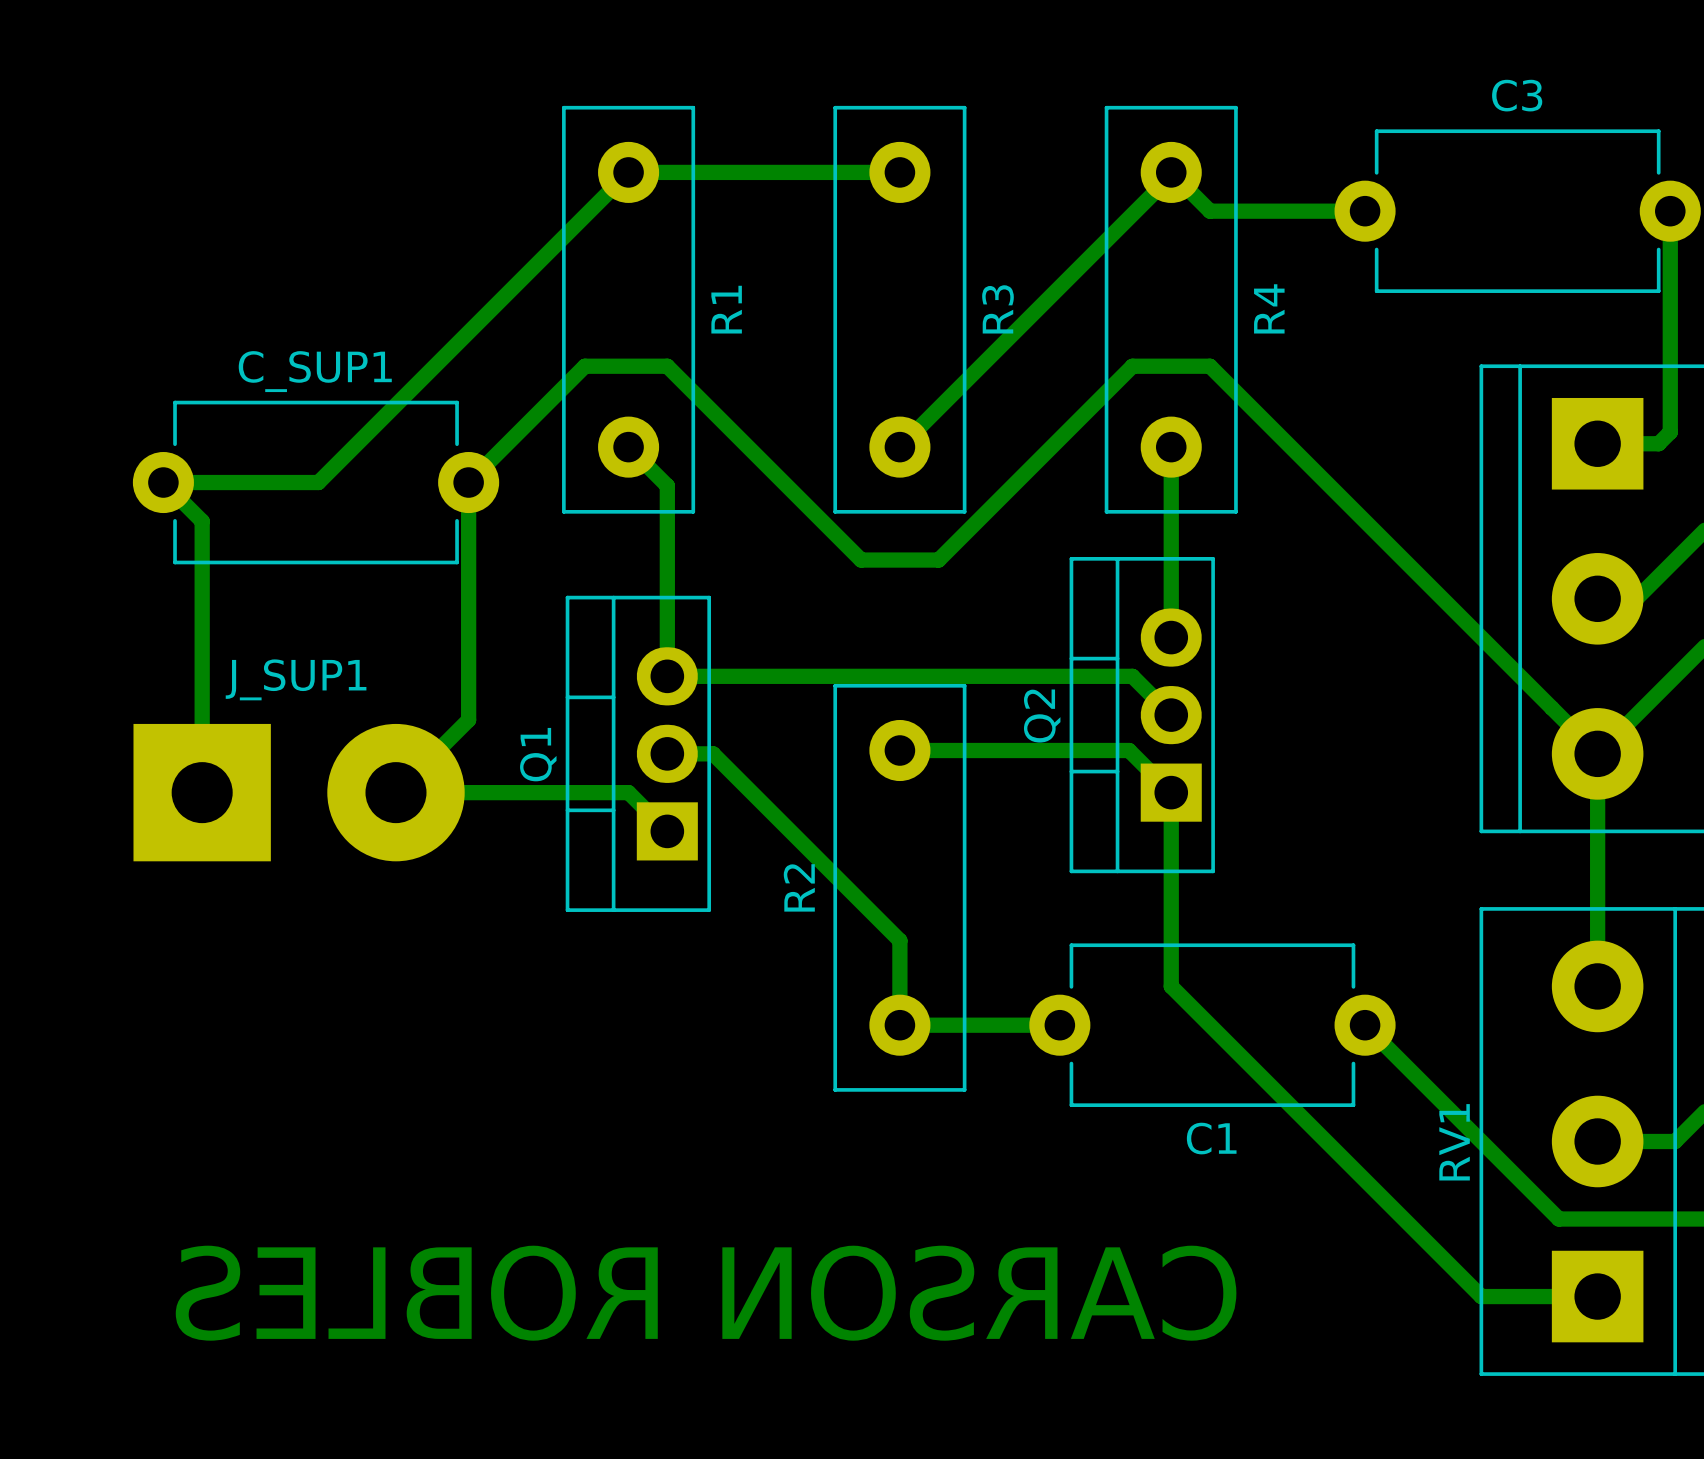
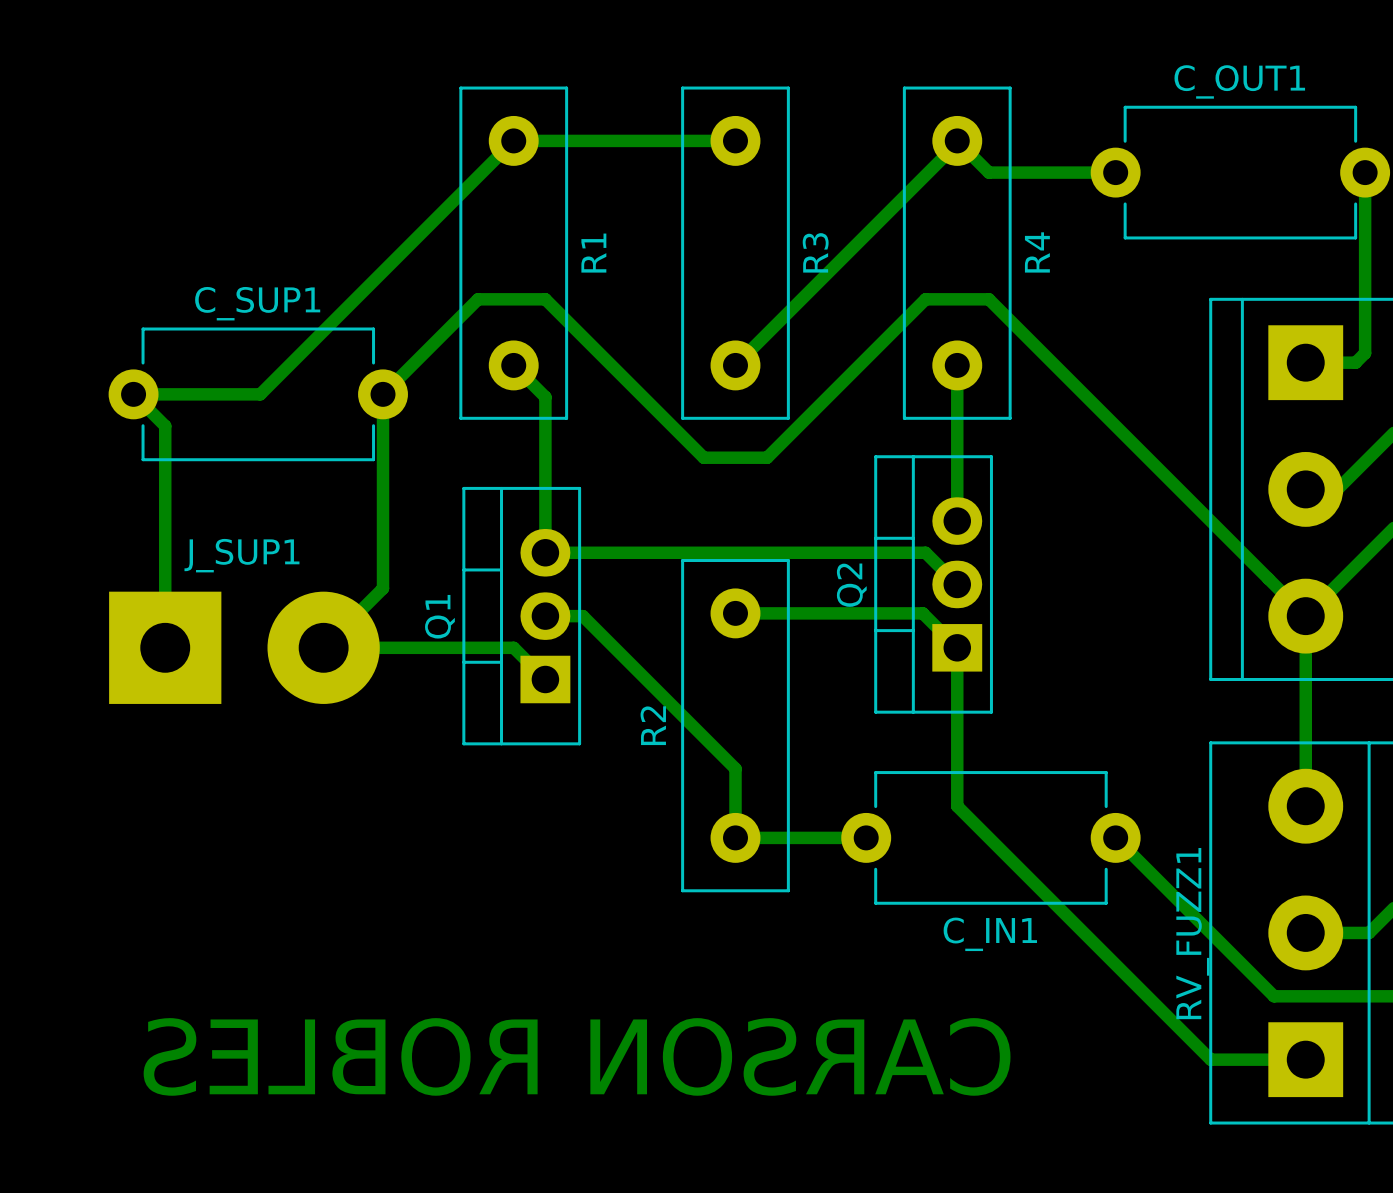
C3 name: C3 (1517, 95) -> C_OUT1 (1239, 81)
C1 name: C1 (1211, 1138) -> C_IN1 (990, 934)
RV1 name: RV1 (1454, 1142) -> RV_FUZZ1 (1192, 933)

